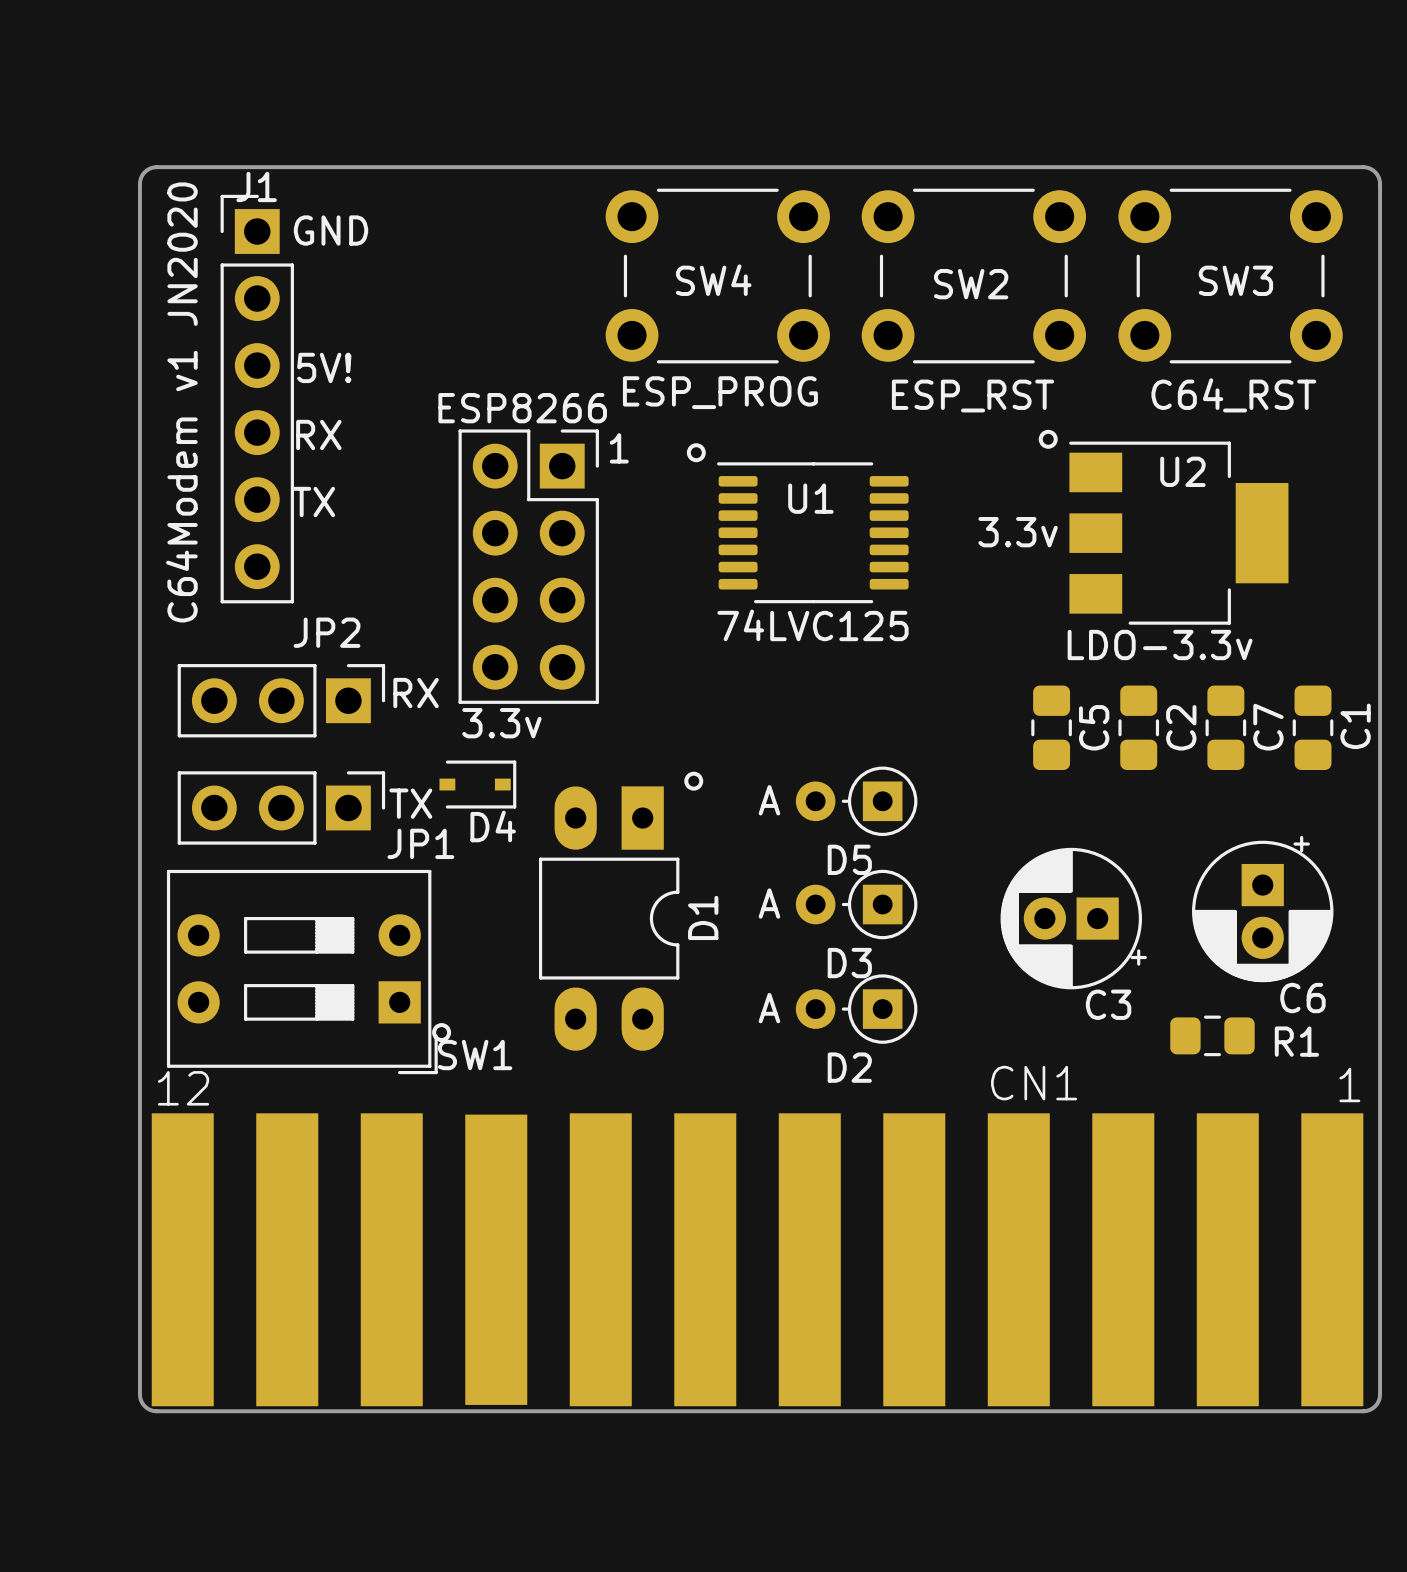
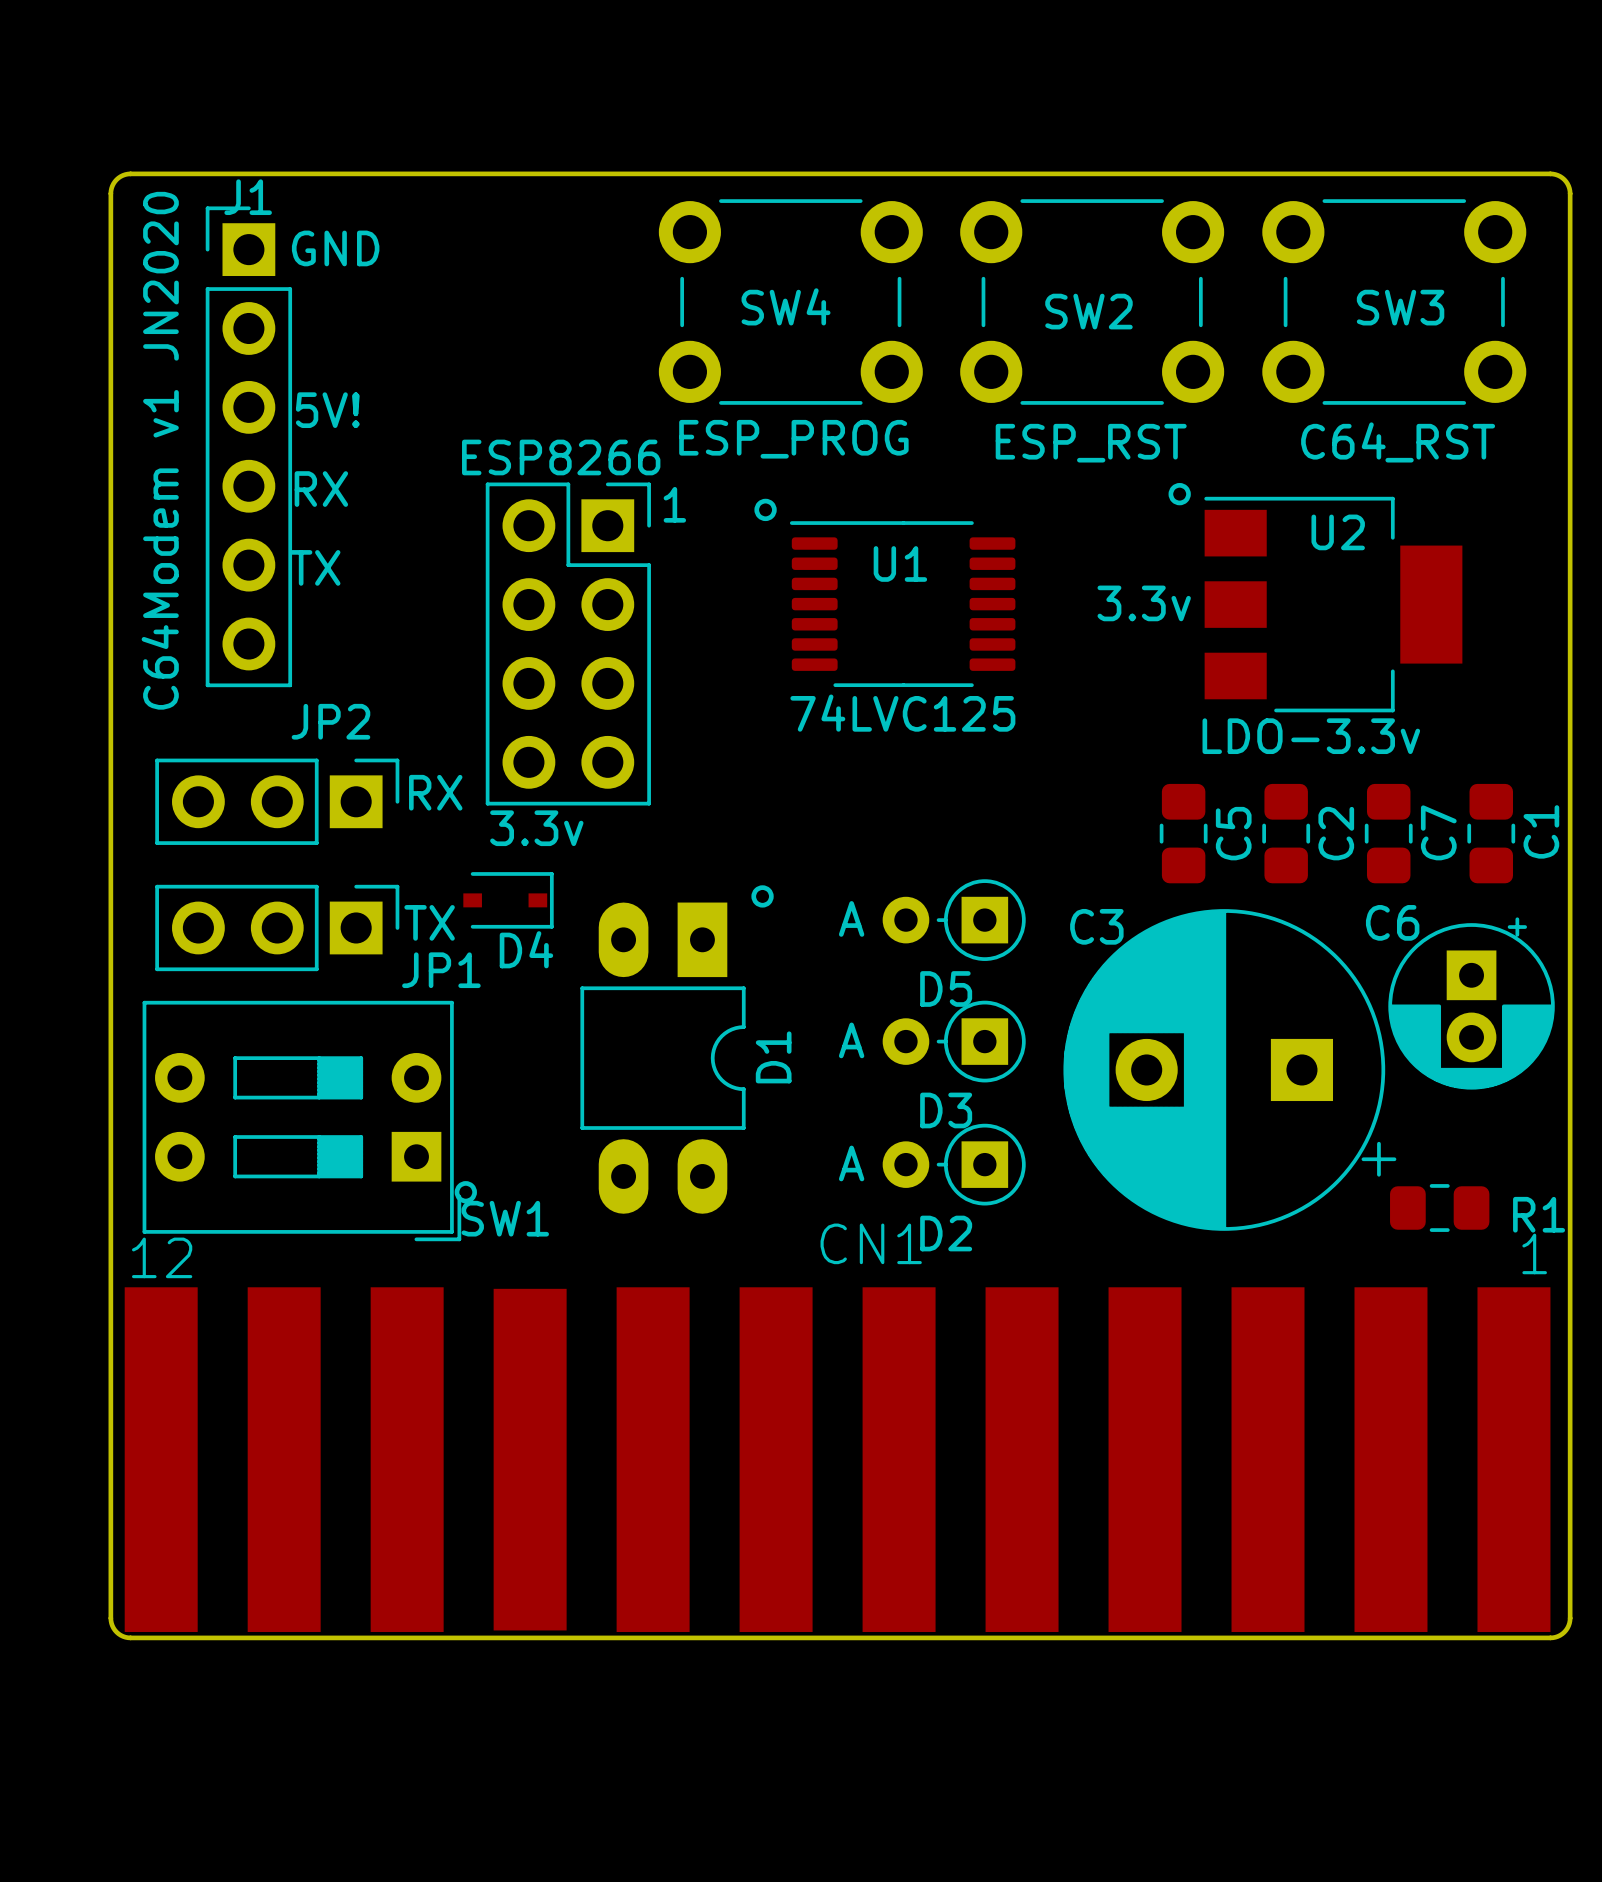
C3 footprint: [1000, 847, 1147, 990] -> [1063, 909, 1397, 1231]
C6 position: (1262, 909) -> (1471, 1003)
C6 name position: C6 (1302, 998) -> C6 (1392, 922)
C3 name position: C3 (1108, 1004) -> C3 (1096, 926)
R1 position: (1212, 1035) -> (1439, 1208)
CN1 name position: CN1 (1034, 1083) -> CN1 (871, 1243)

